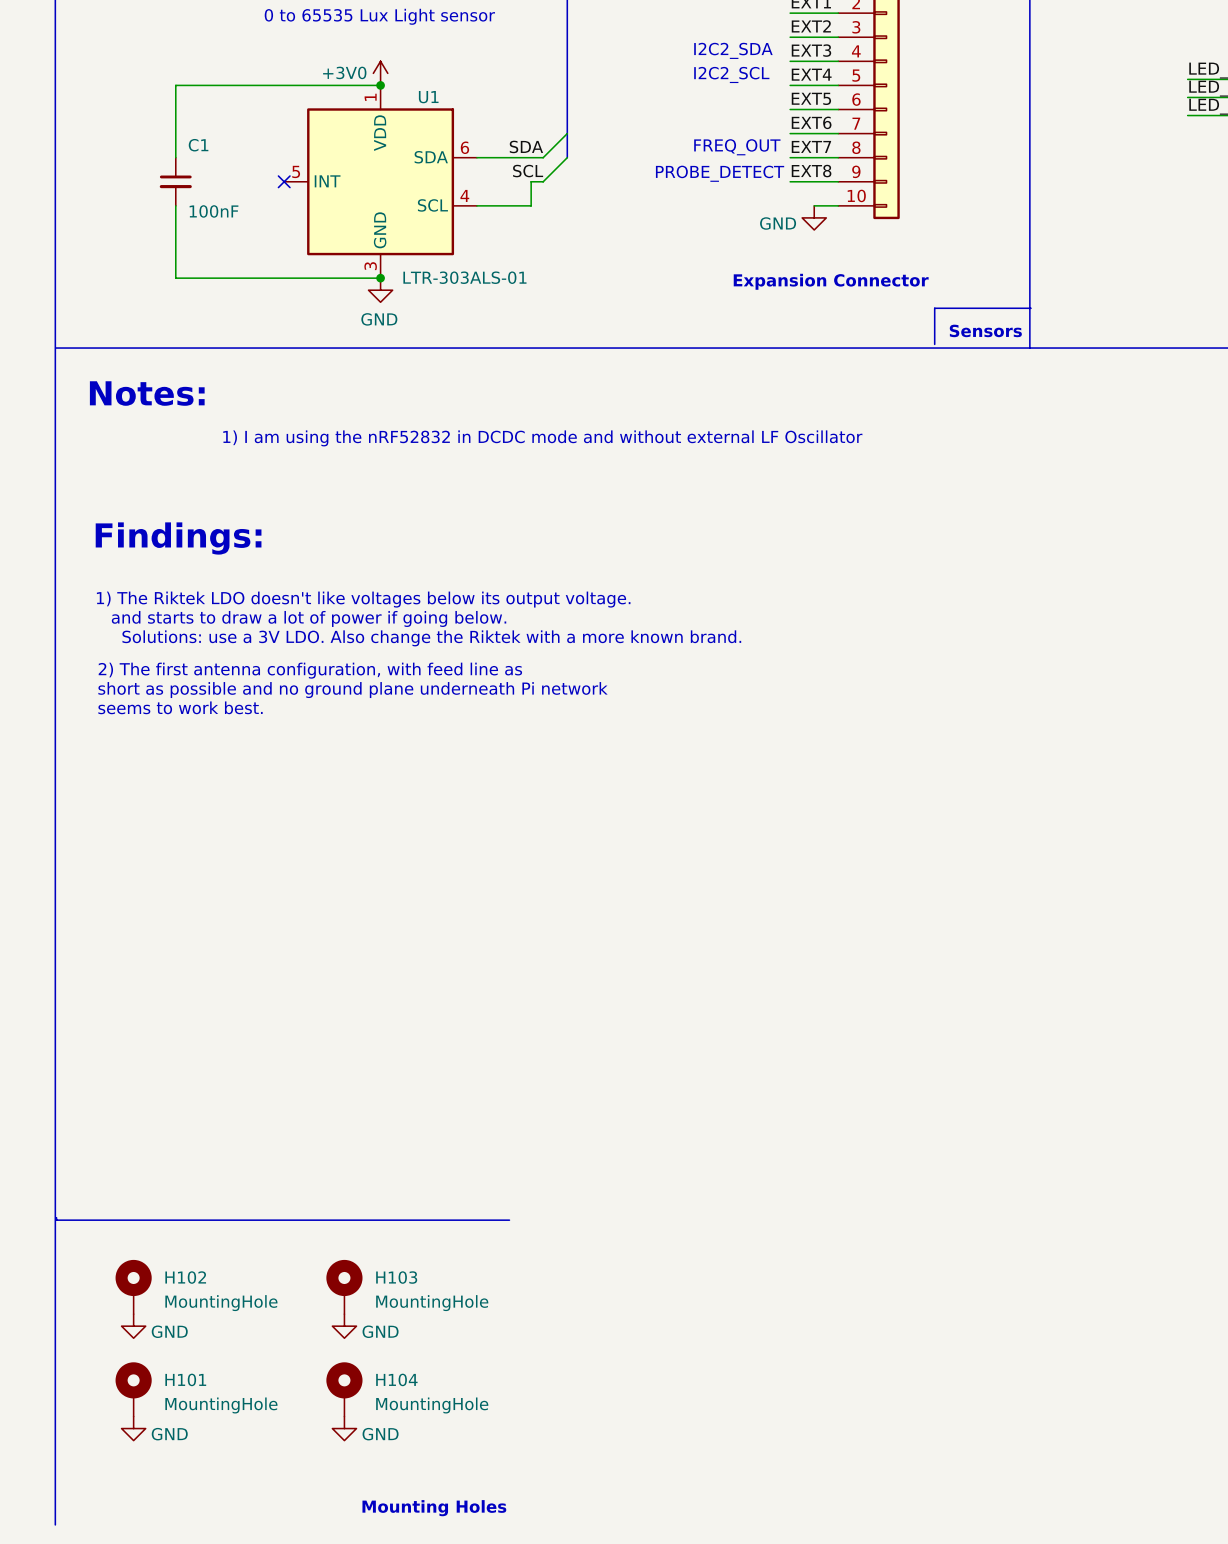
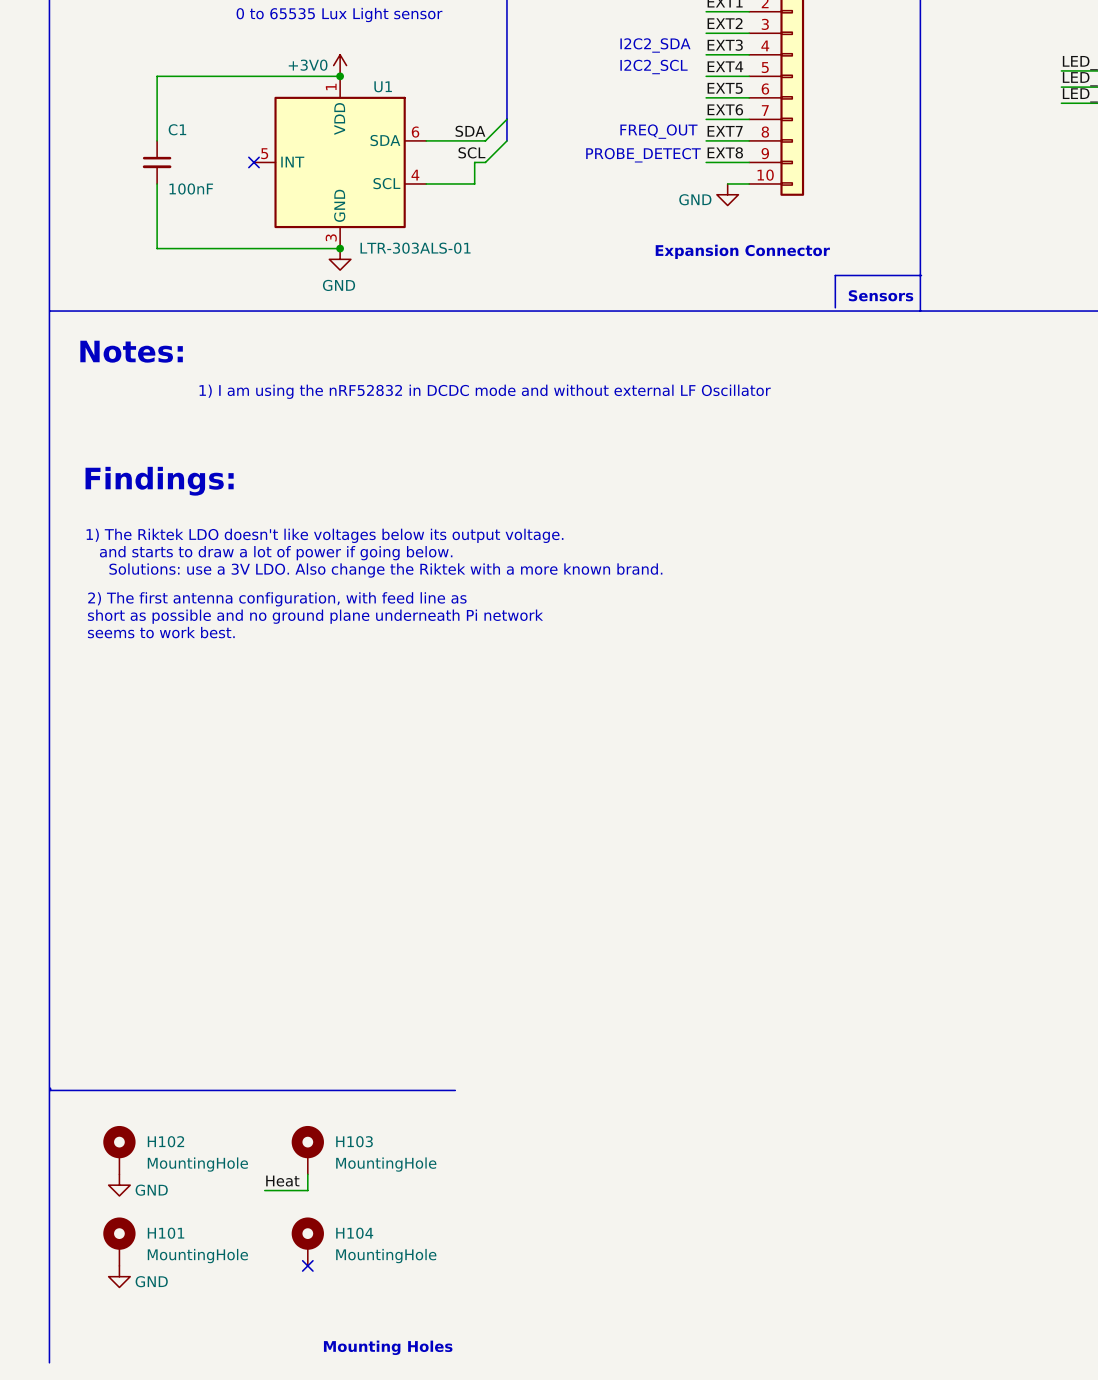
wire: none -> (307, 1174) (307, 1190) (264, 1190)
label: none -> Heat (282, 1181)
power symbol: GND (344, 1326) -> none
no-connect mark: none -> (307, 1265)
power symbol: GND (344, 1428) -> none

